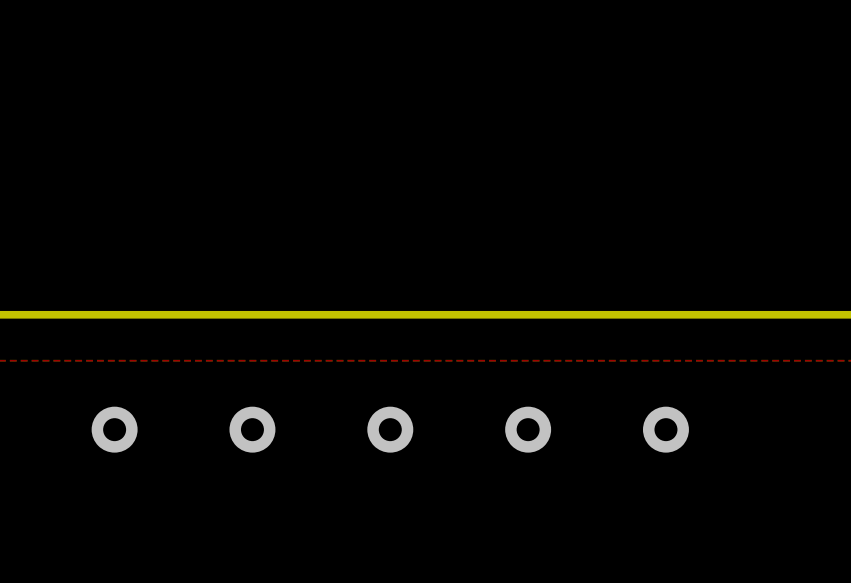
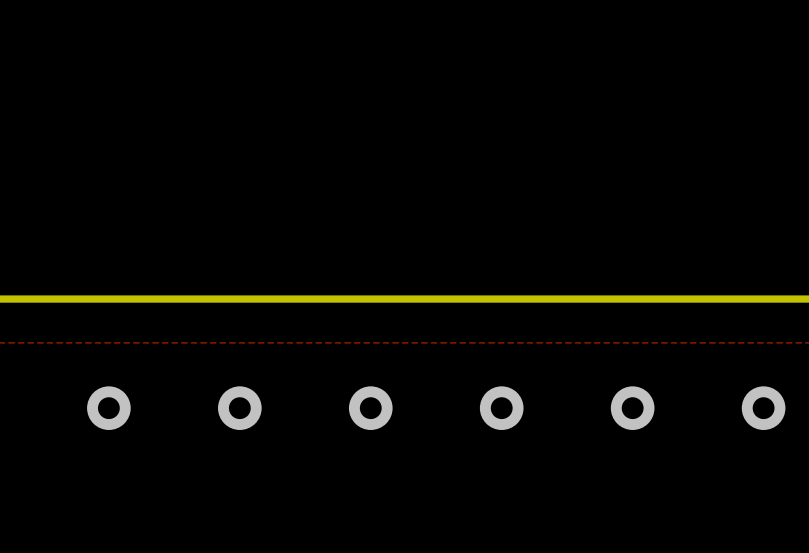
via: none -> (763, 408)

